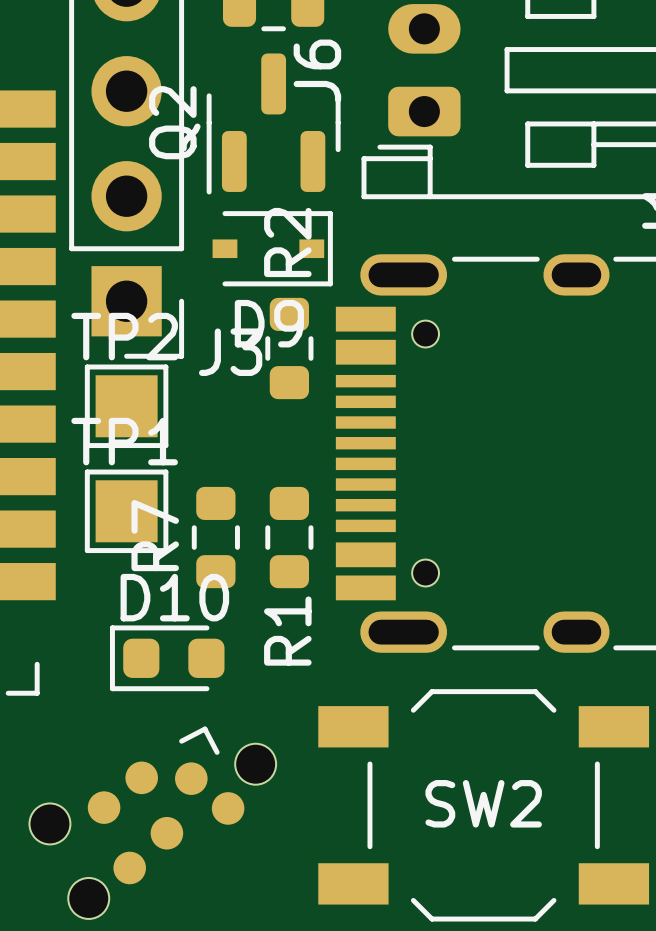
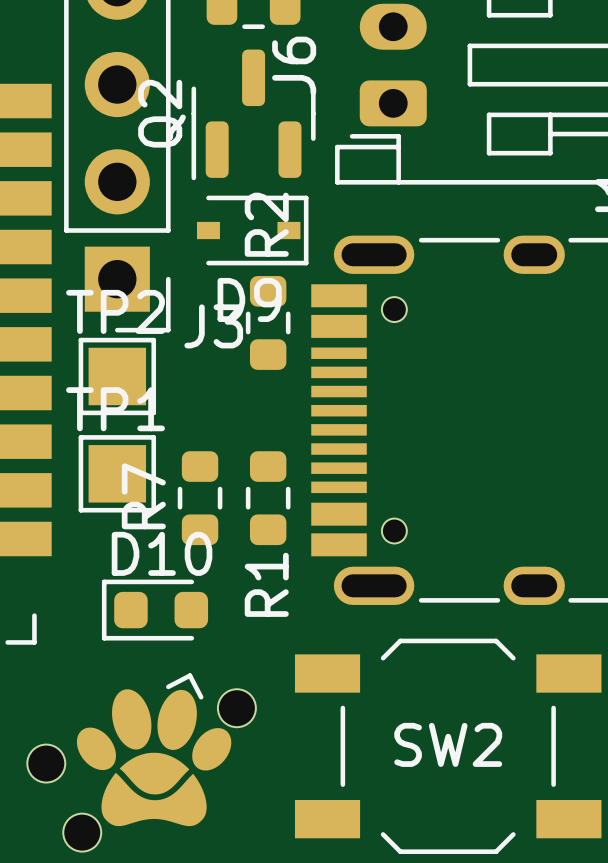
part footprint: [29, 726, 277, 919] -> [27, 673, 256, 852]

